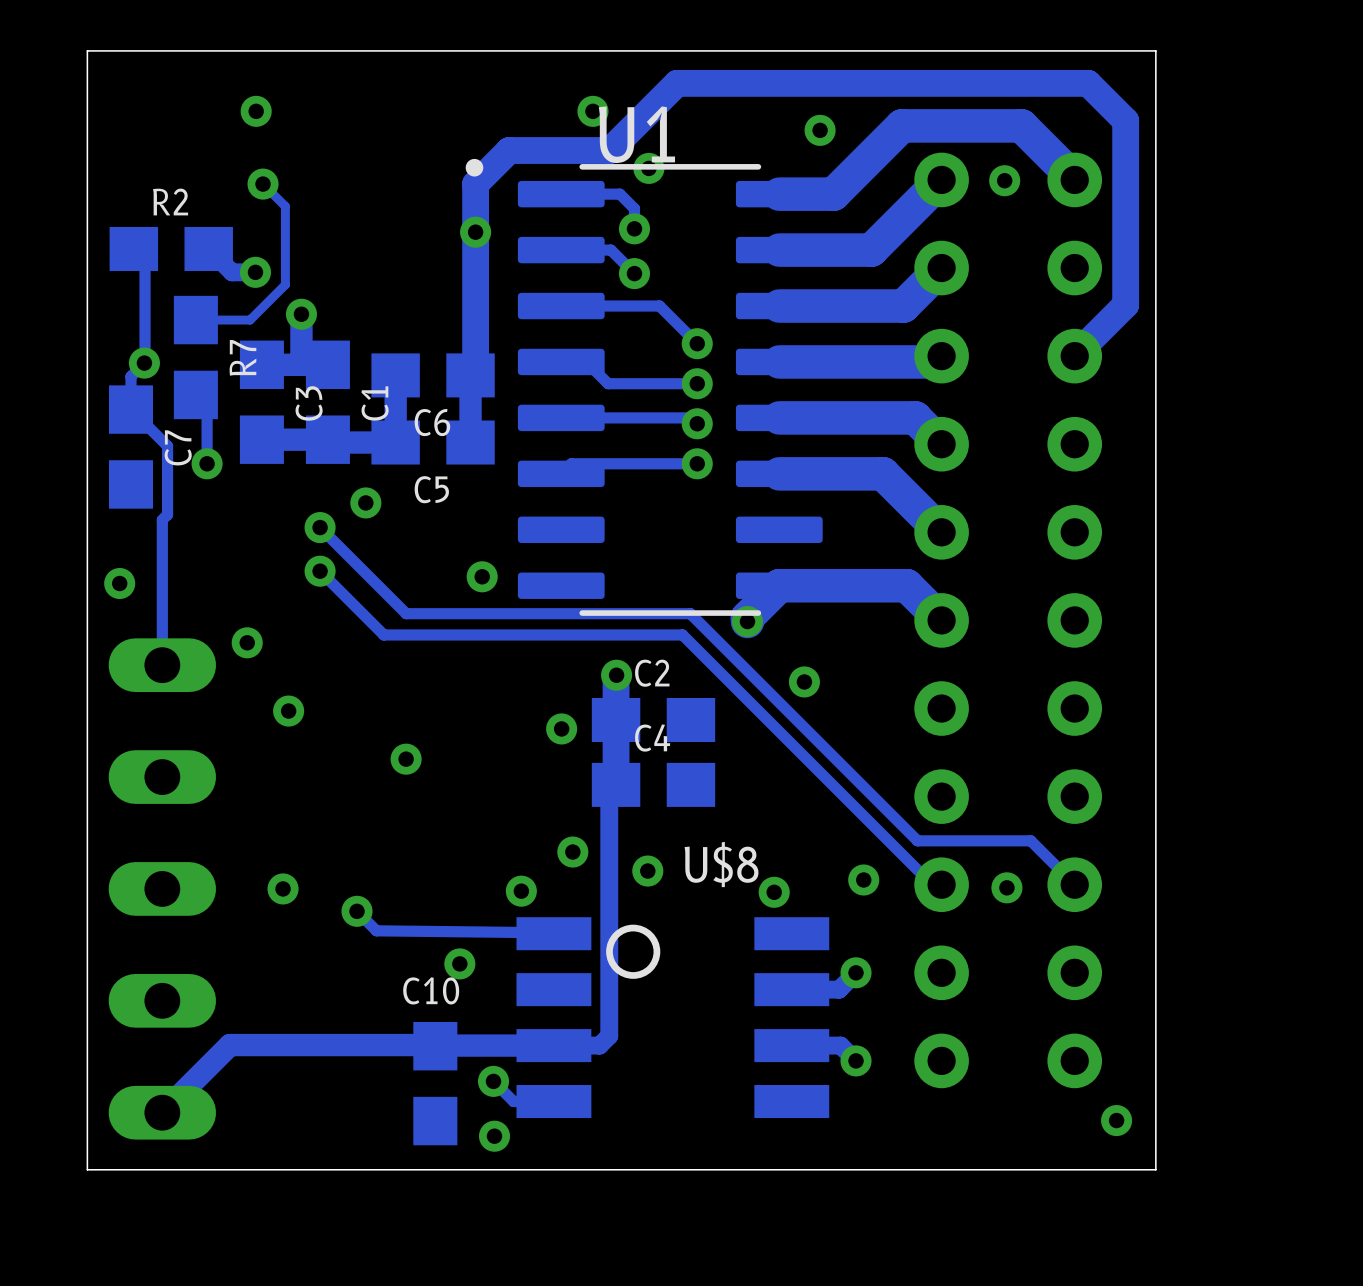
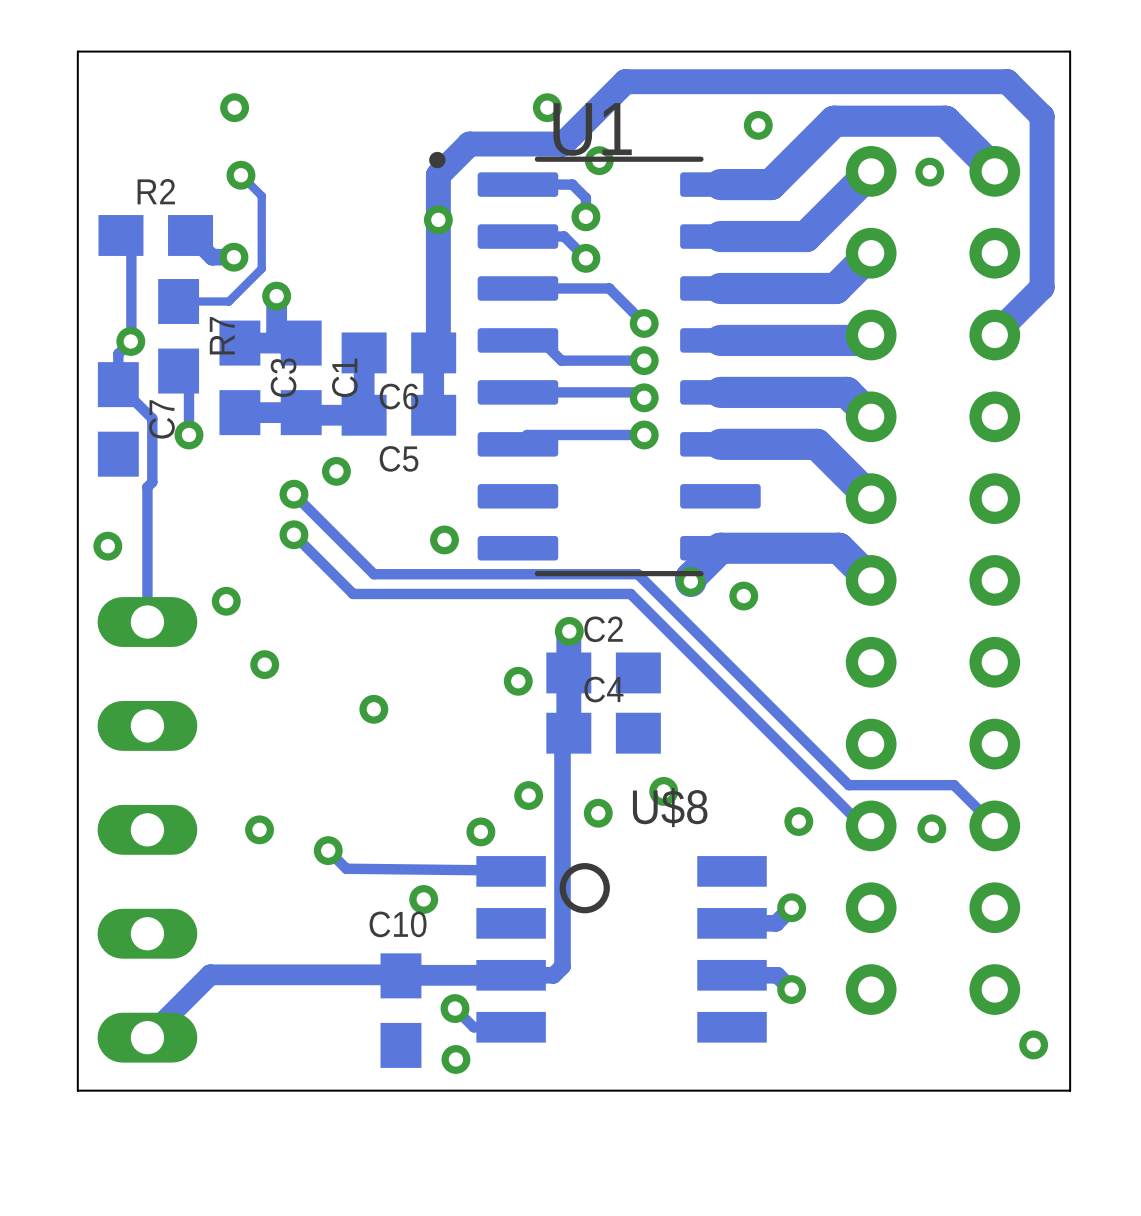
via position: (804, 681) -> (743, 596)
via position: (774, 892) -> (663, 791)

